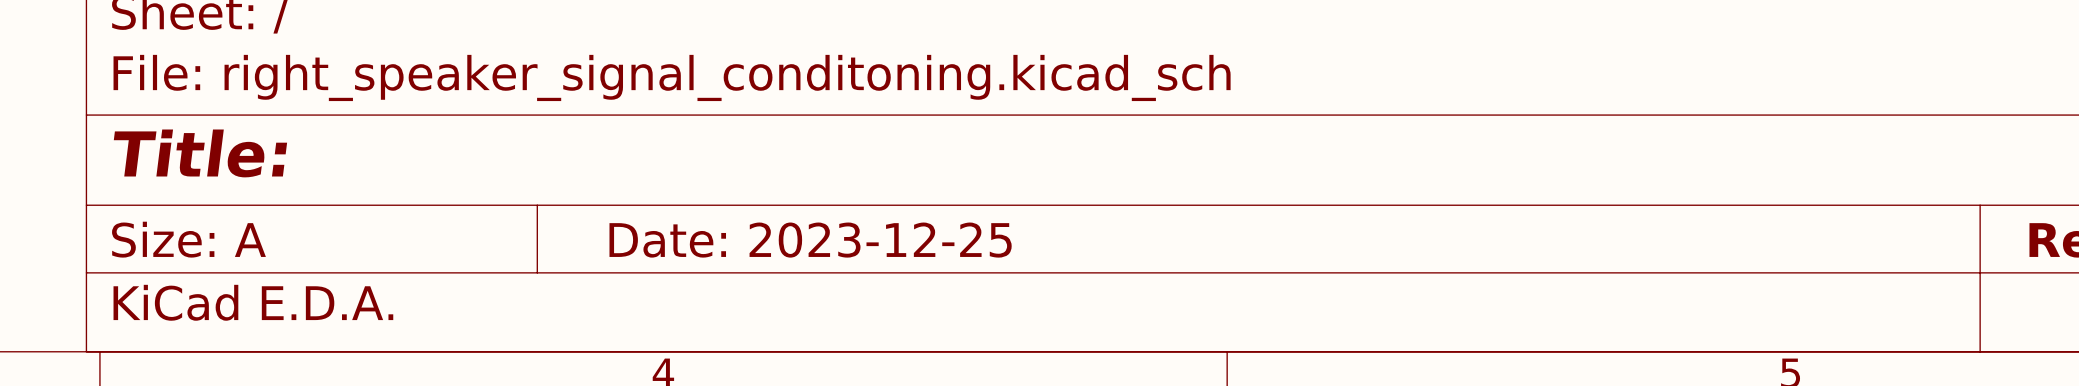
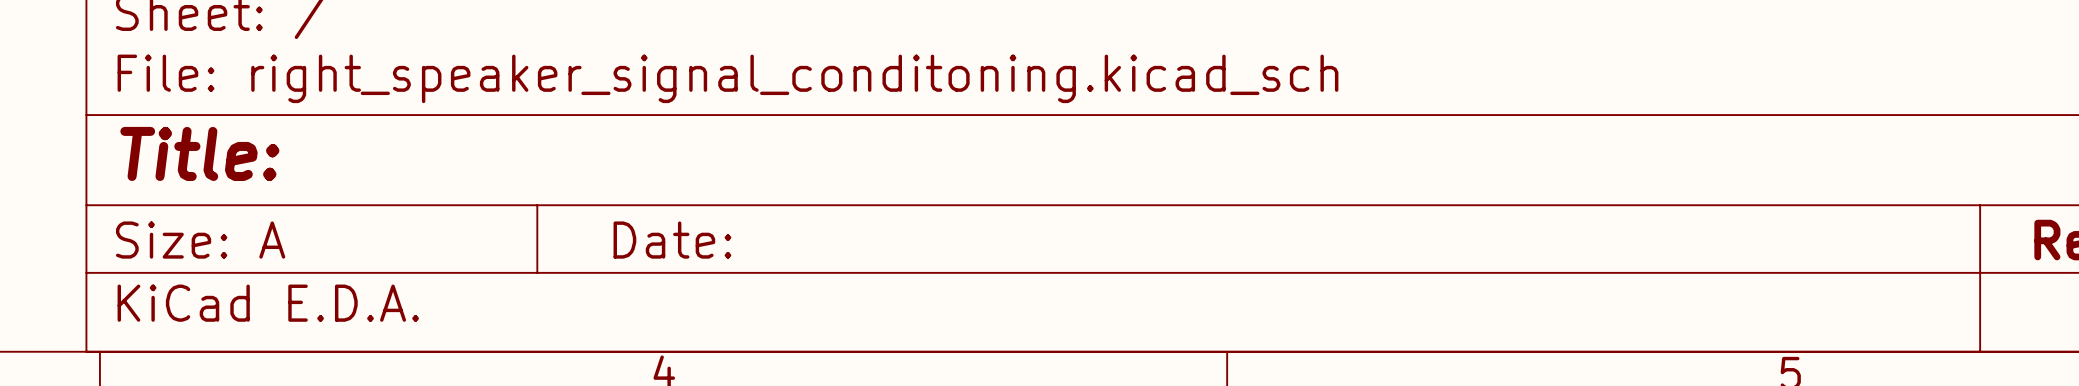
title block: Date: 2023-12-25 (810, 240) -> Date: (672, 240)

